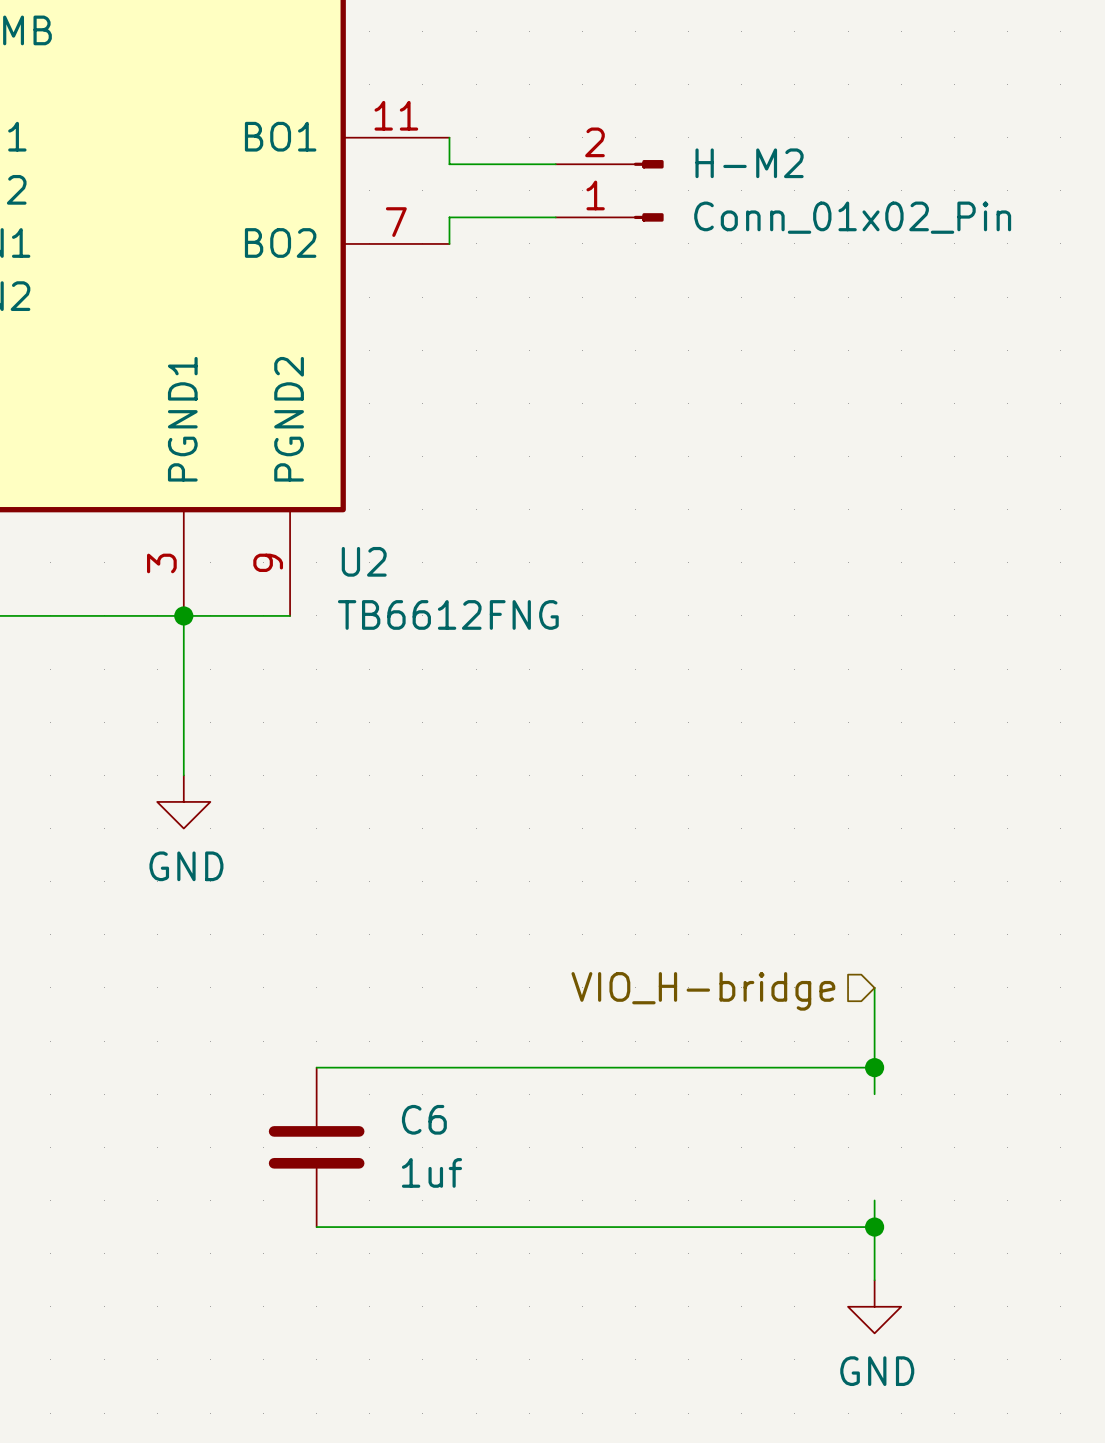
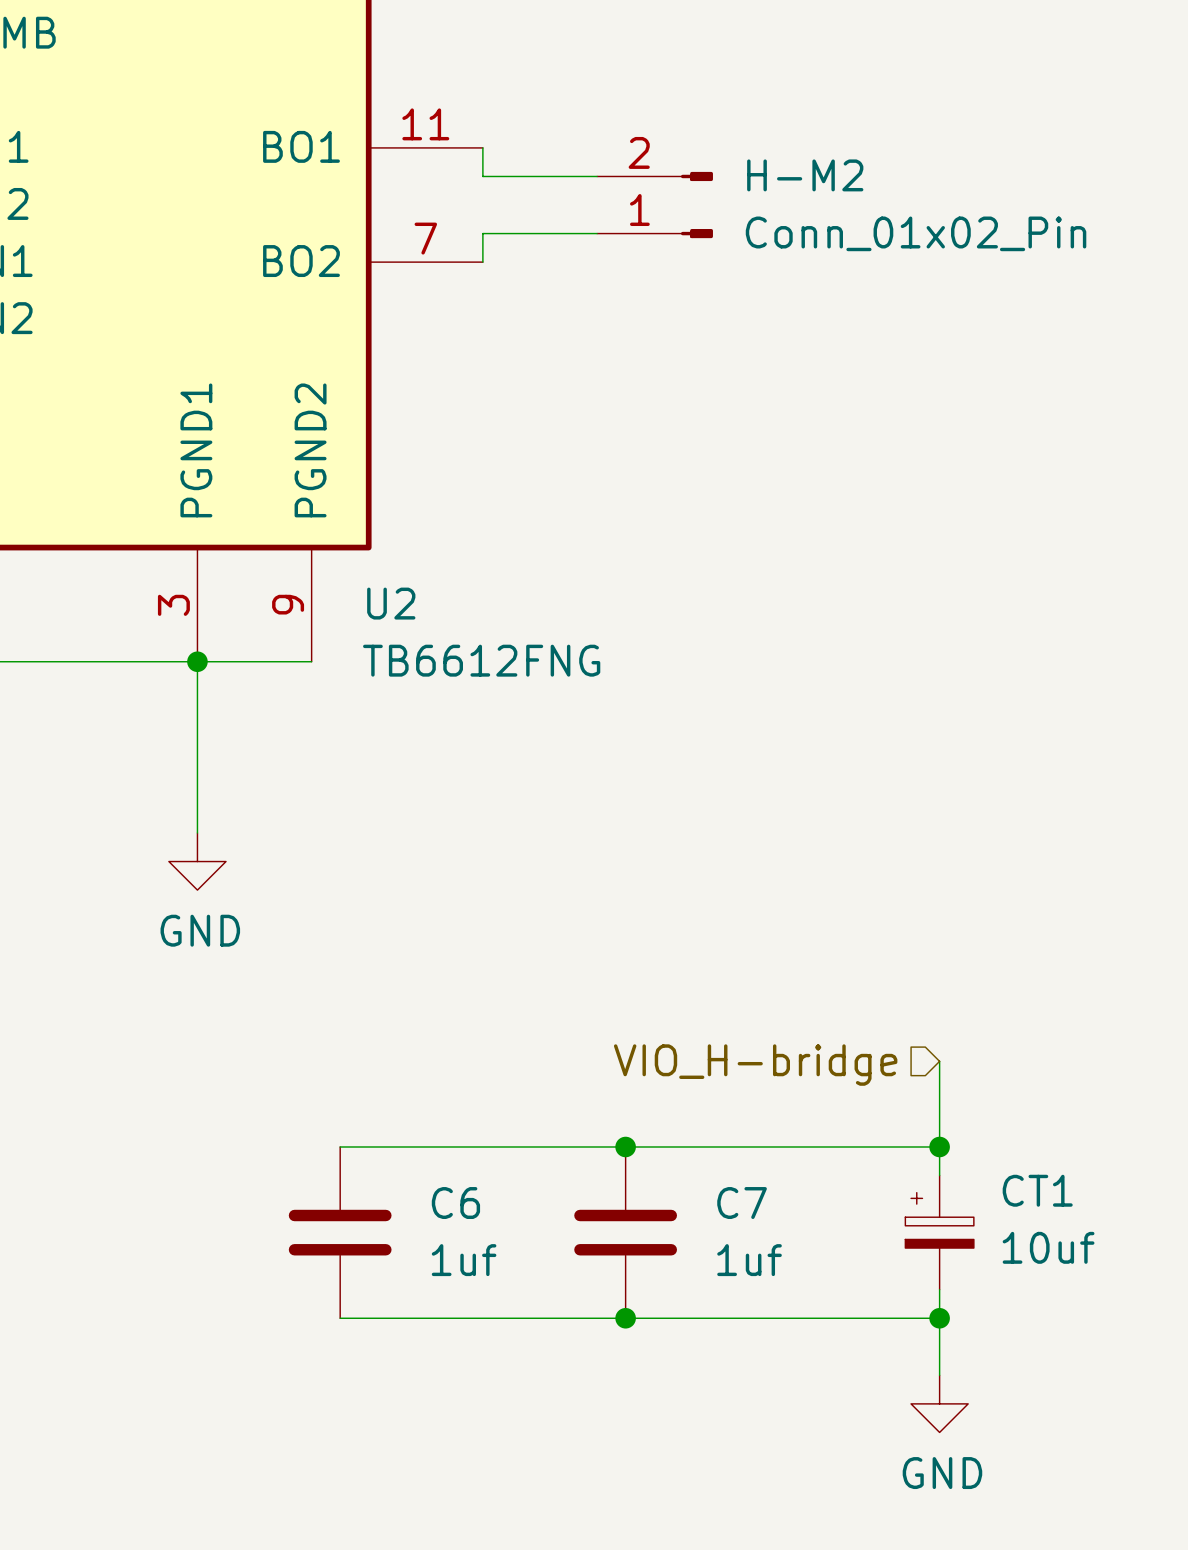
junction: none -> (625, 1146)
C7: none -> 1uf (625, 1232)
CT1: none -> 10uf (939, 1232)
junction: none -> (625, 1318)

